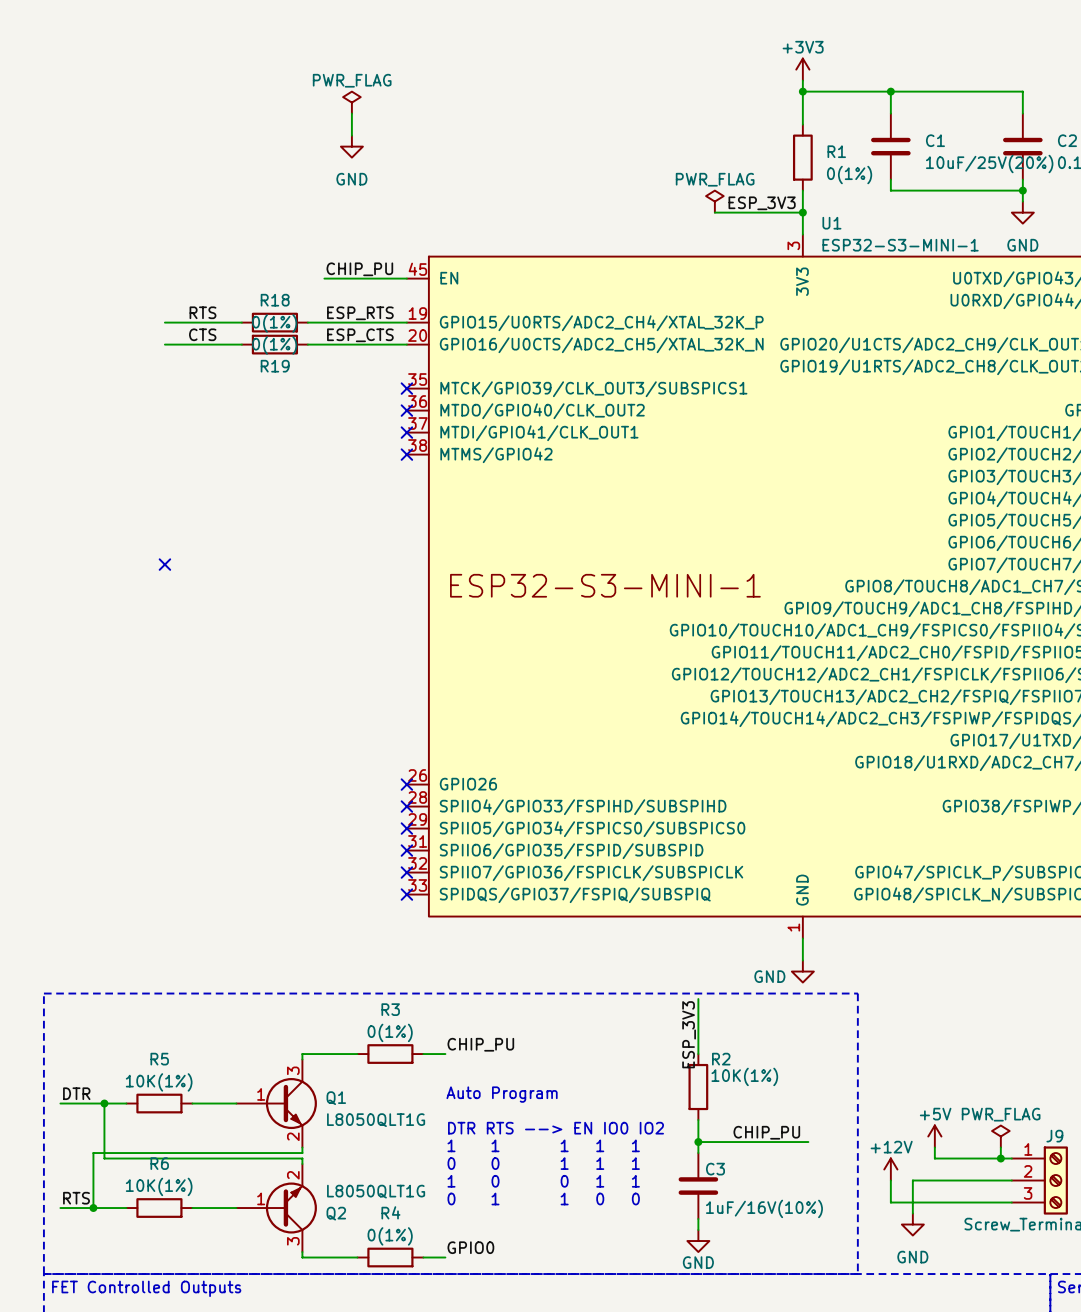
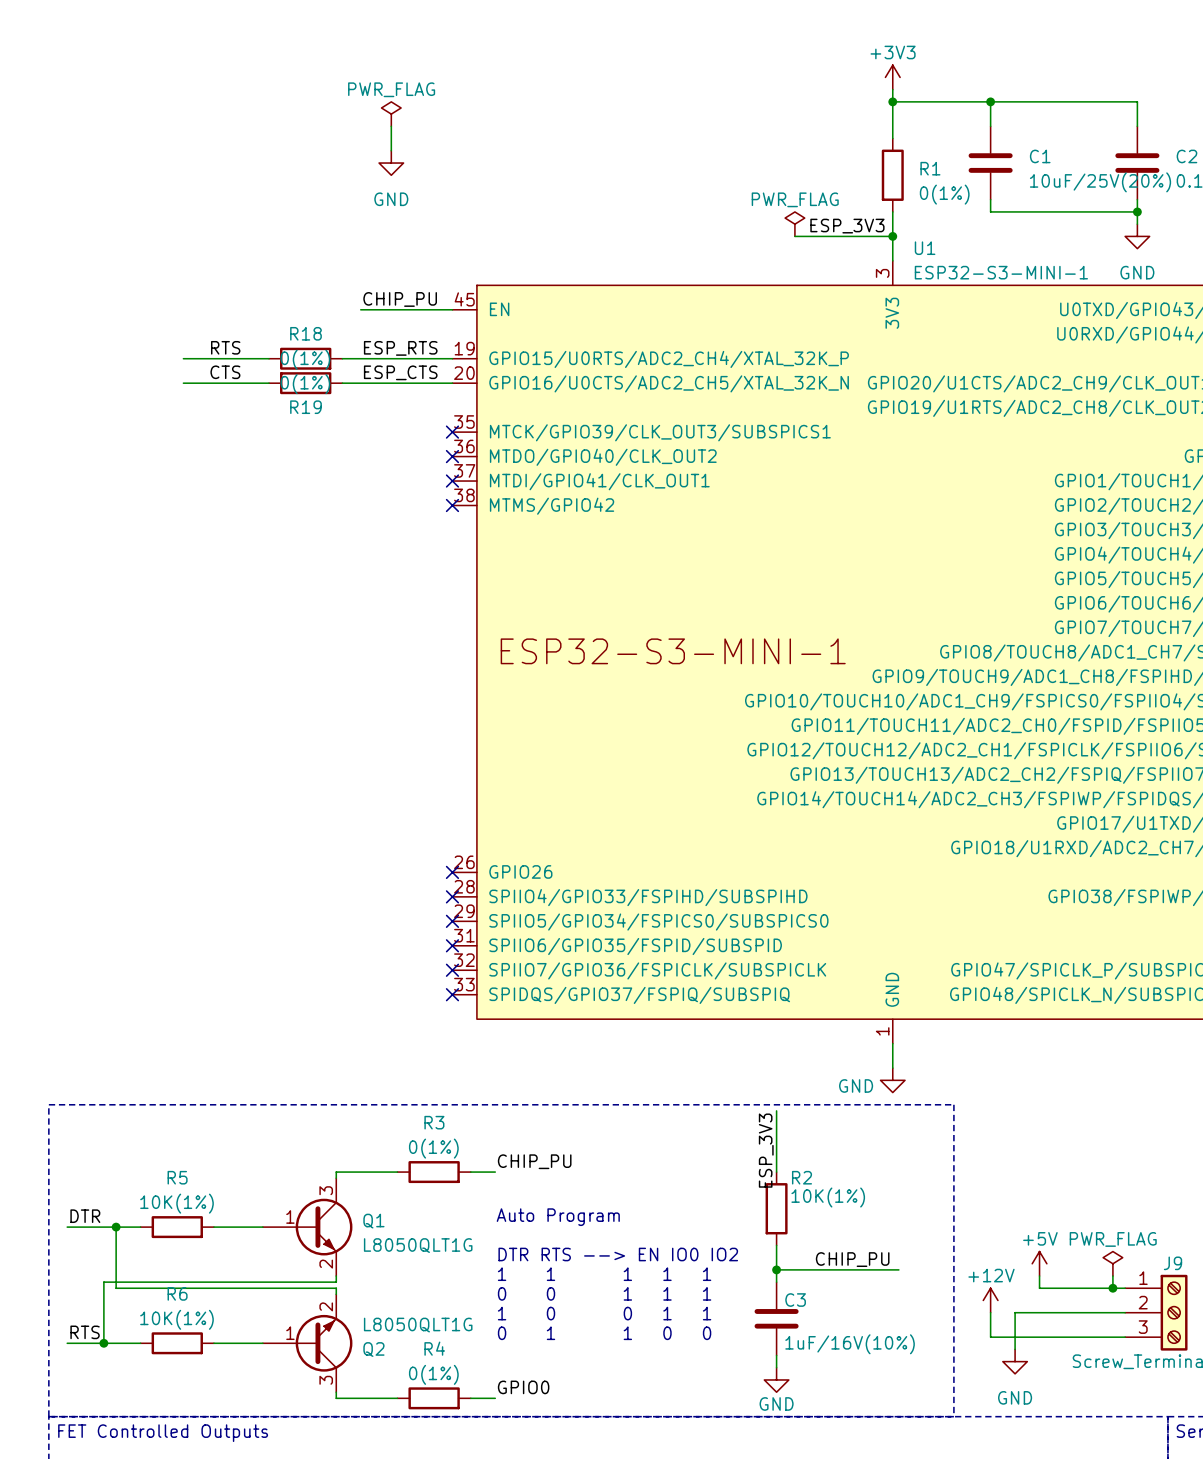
no-connect mark: (164, 564) -> none

